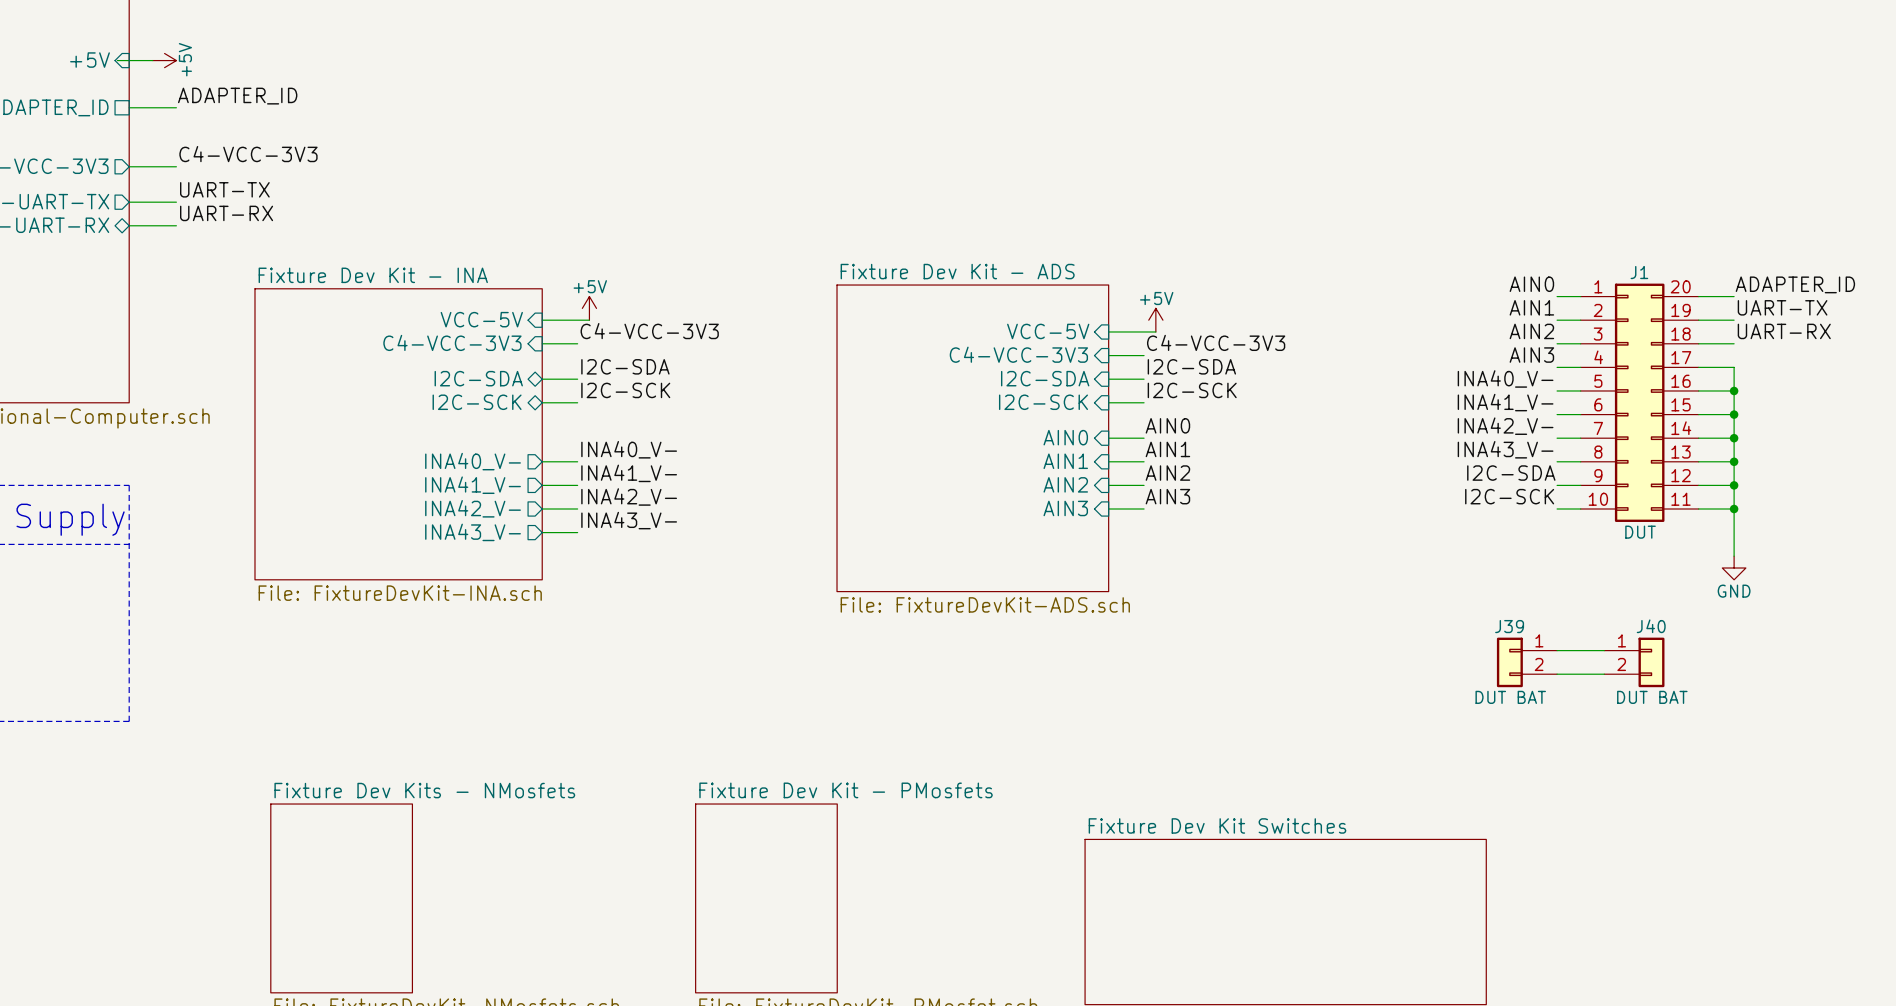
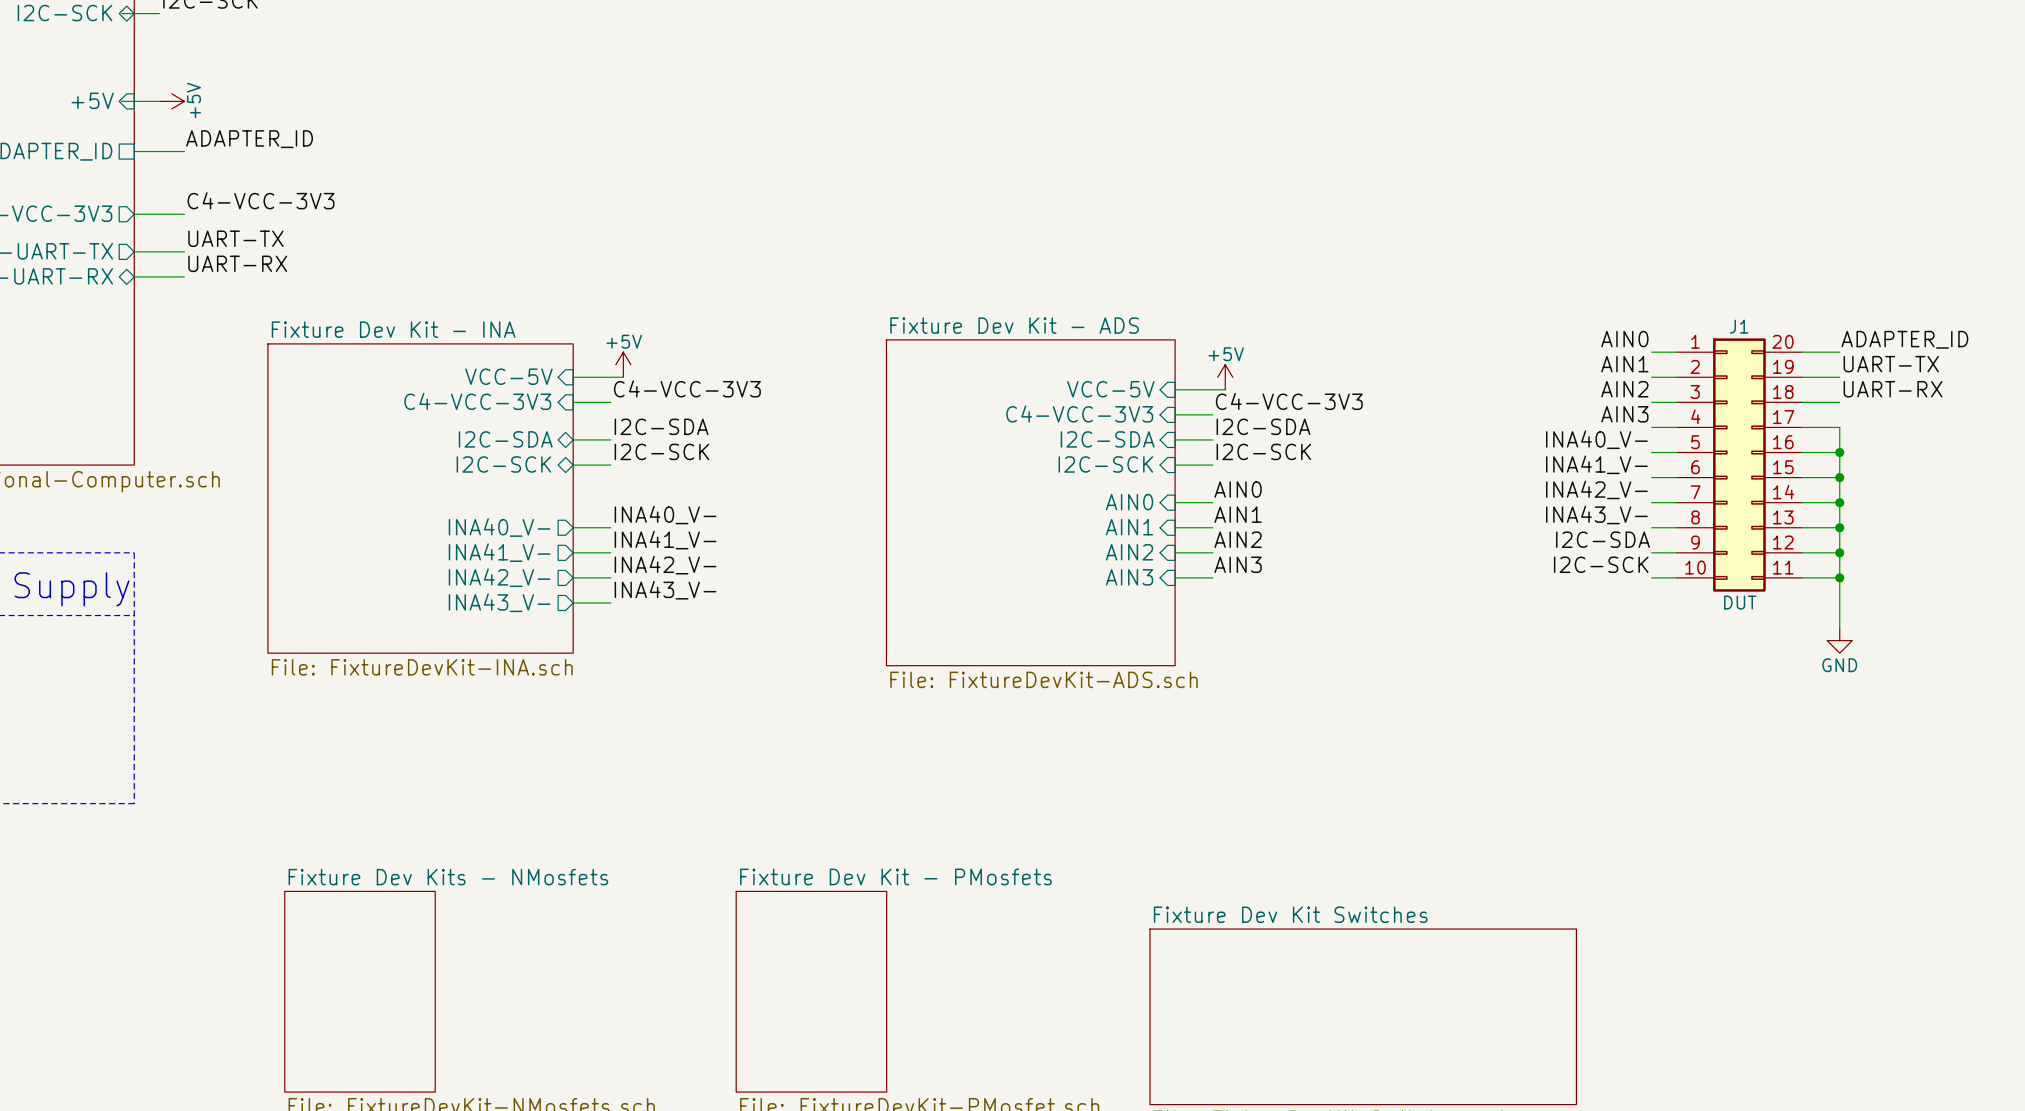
wire: (1557, 650) (1604, 650) -> none
J39: DUT BAT (1526, 662) -> none
J40: DUT BAT (1634, 662) -> none
wire: (1557, 674) (1604, 674) -> none

